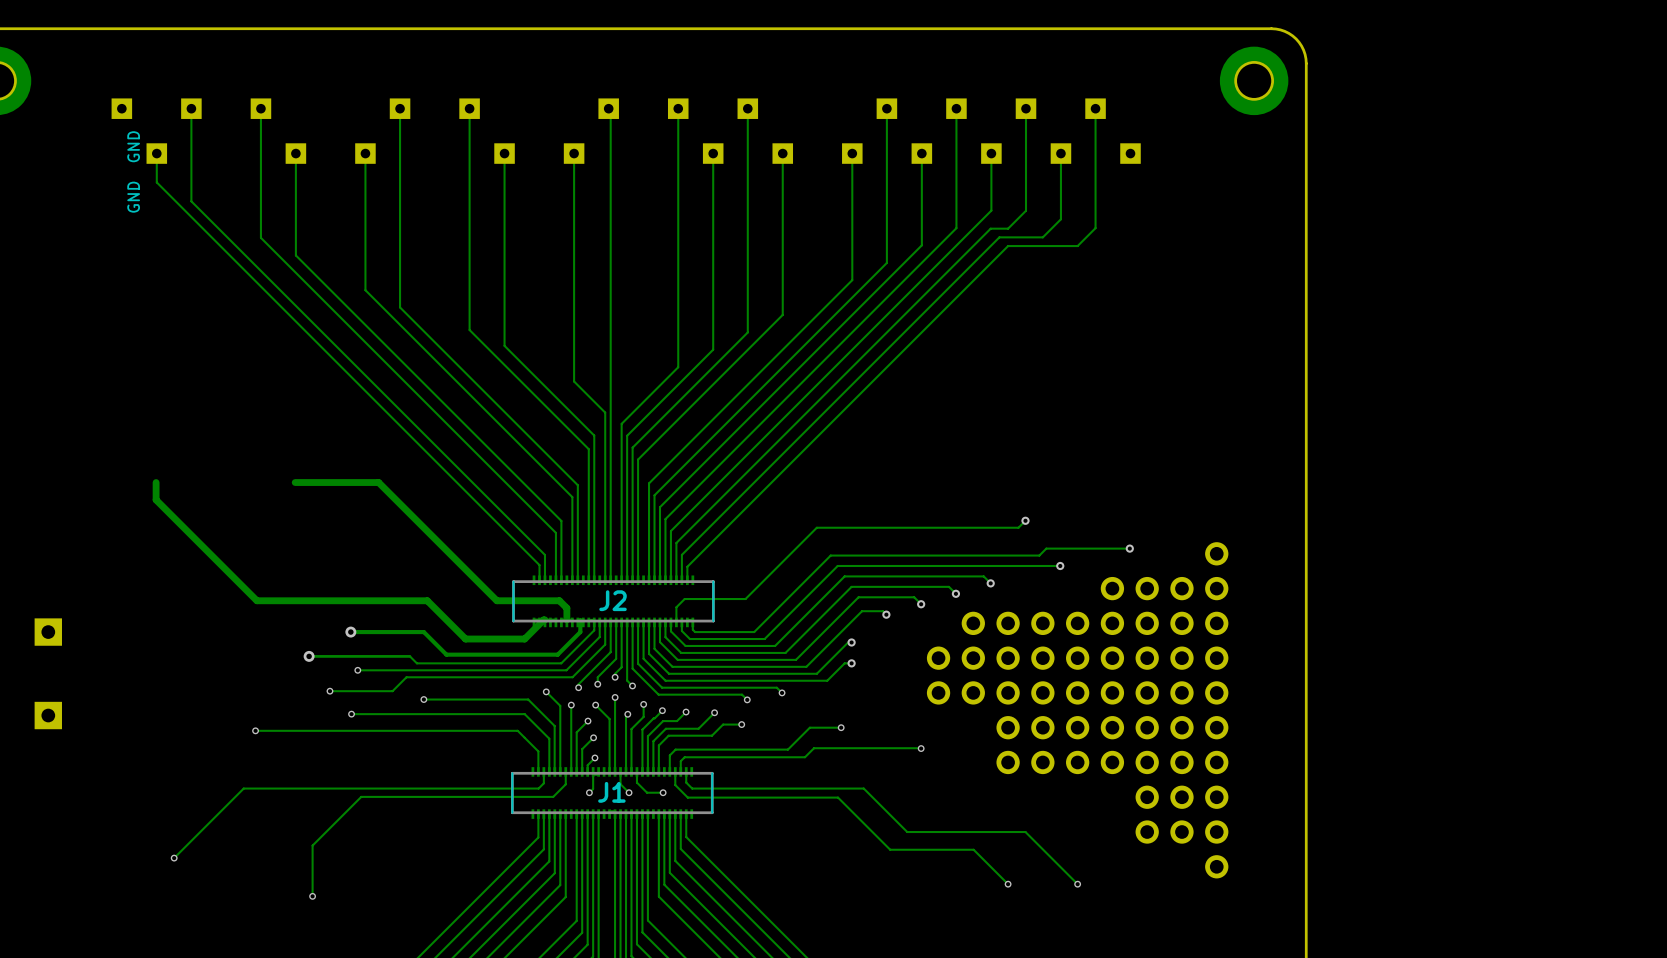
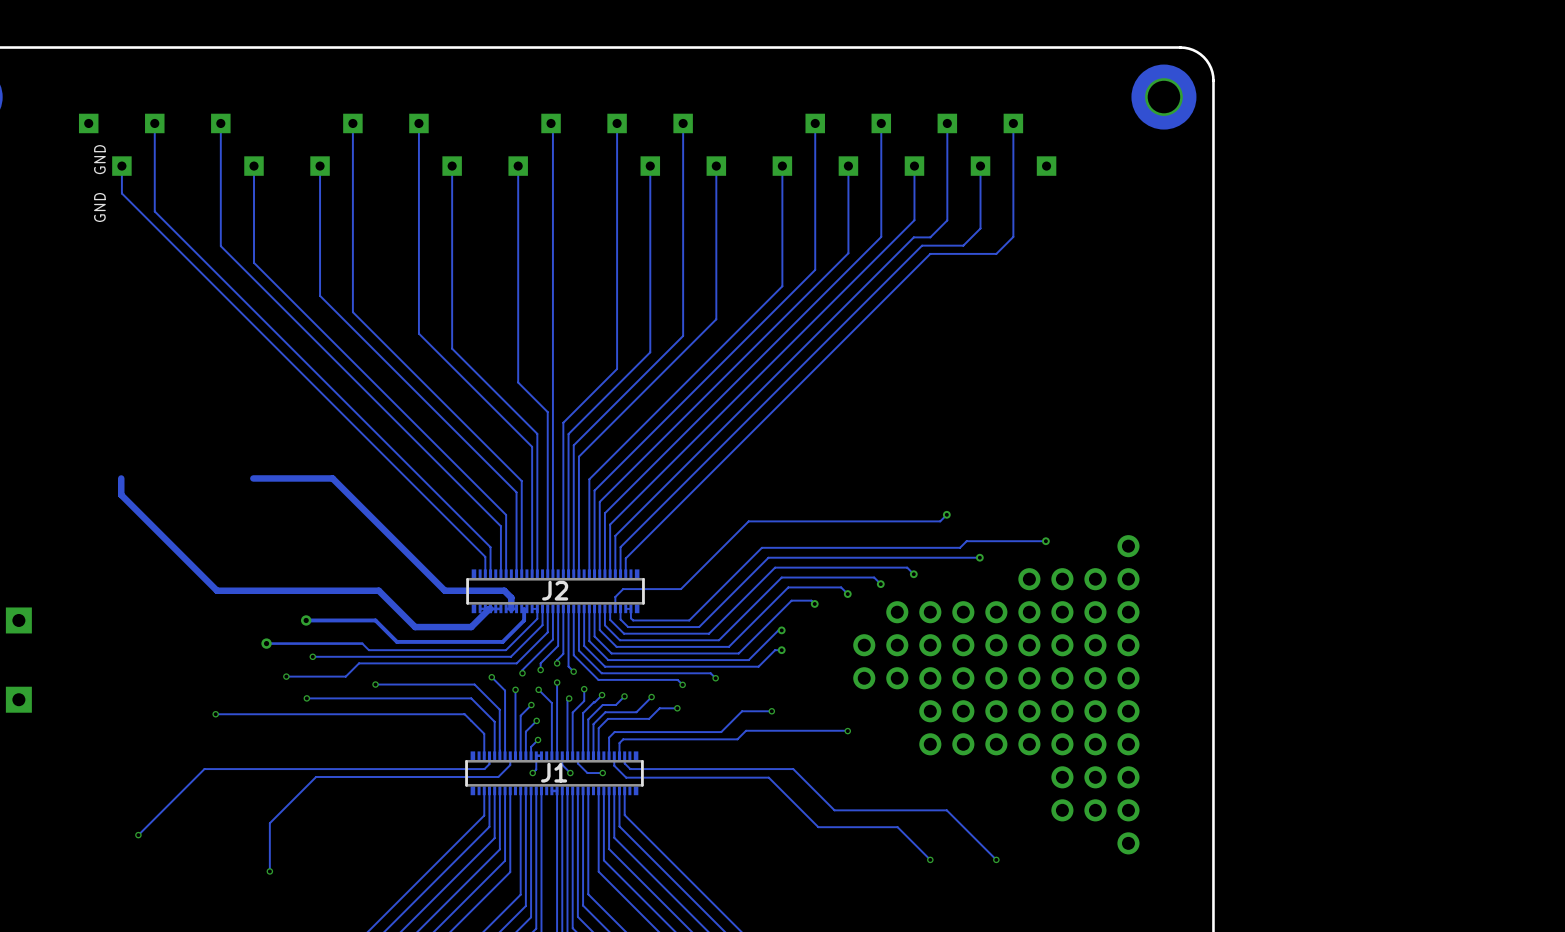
J2 footprint: [512, 575, 715, 628] -> [466, 569, 645, 614]
J1 footprint: [511, 767, 714, 819] -> [465, 751, 644, 796]

